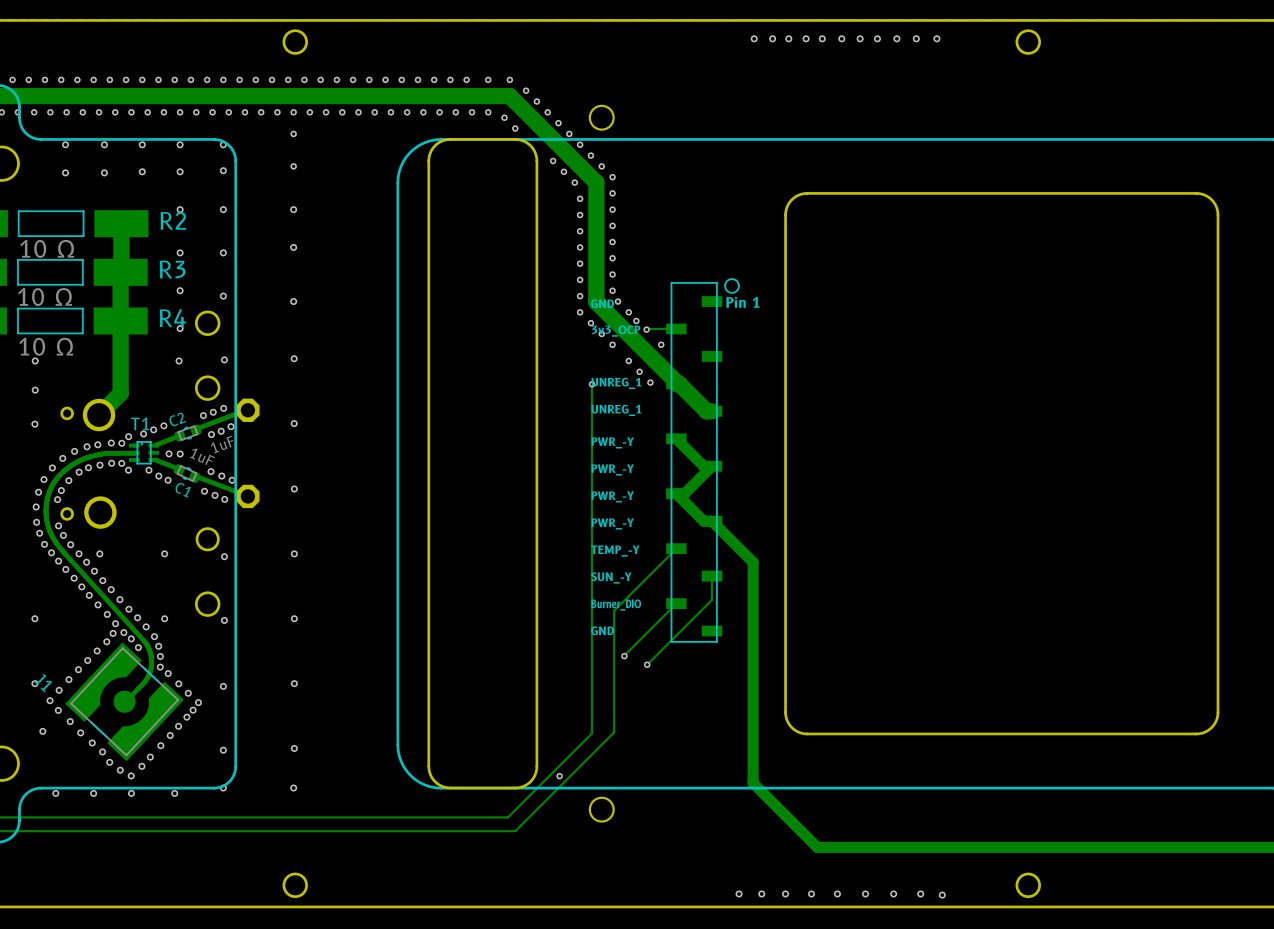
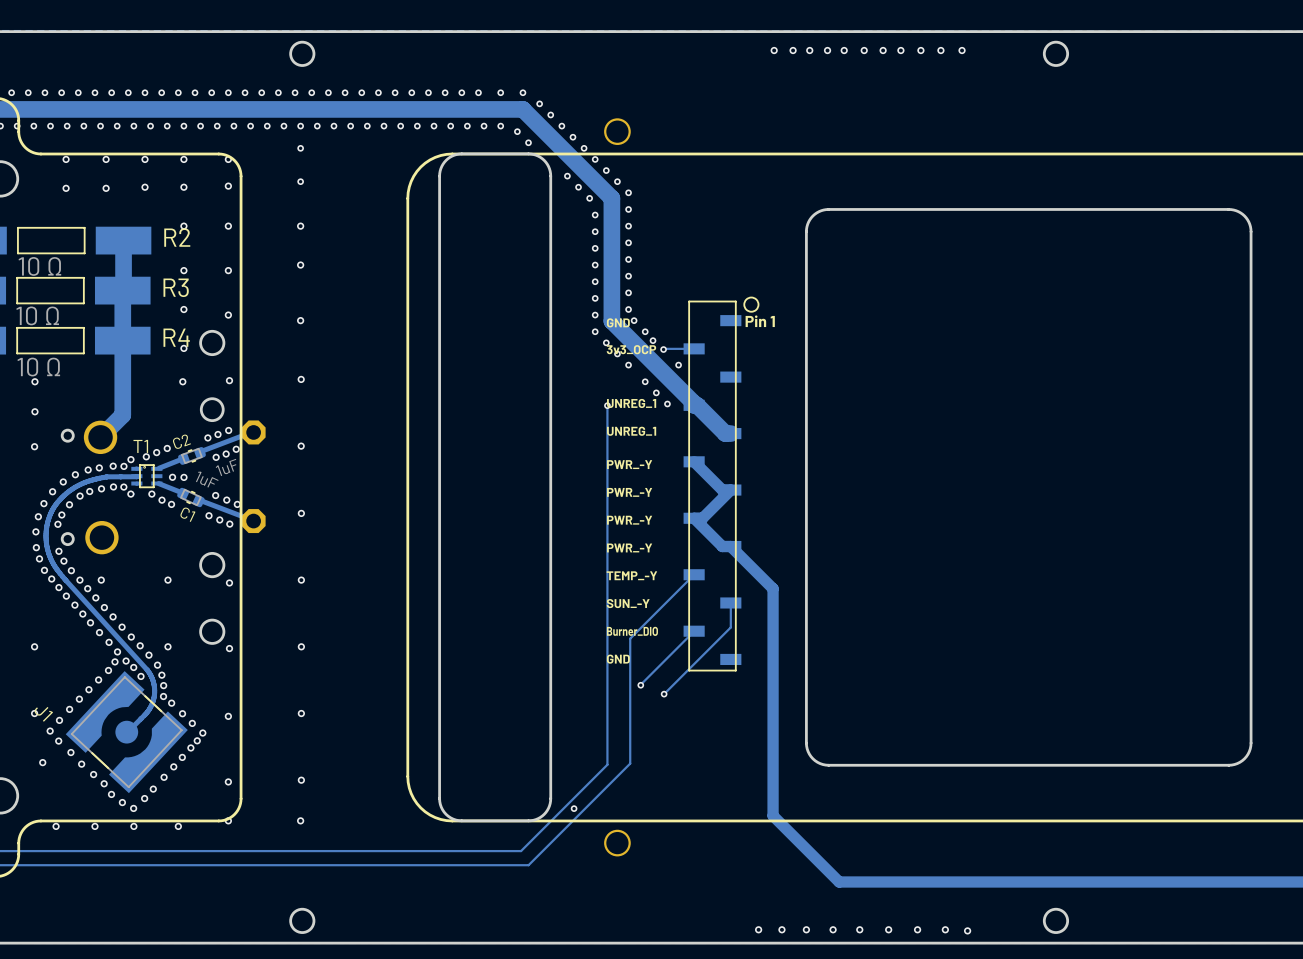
round board edge position: (207, 388) -> (212, 565)
round board edge position: (207, 539) -> (212, 409)

